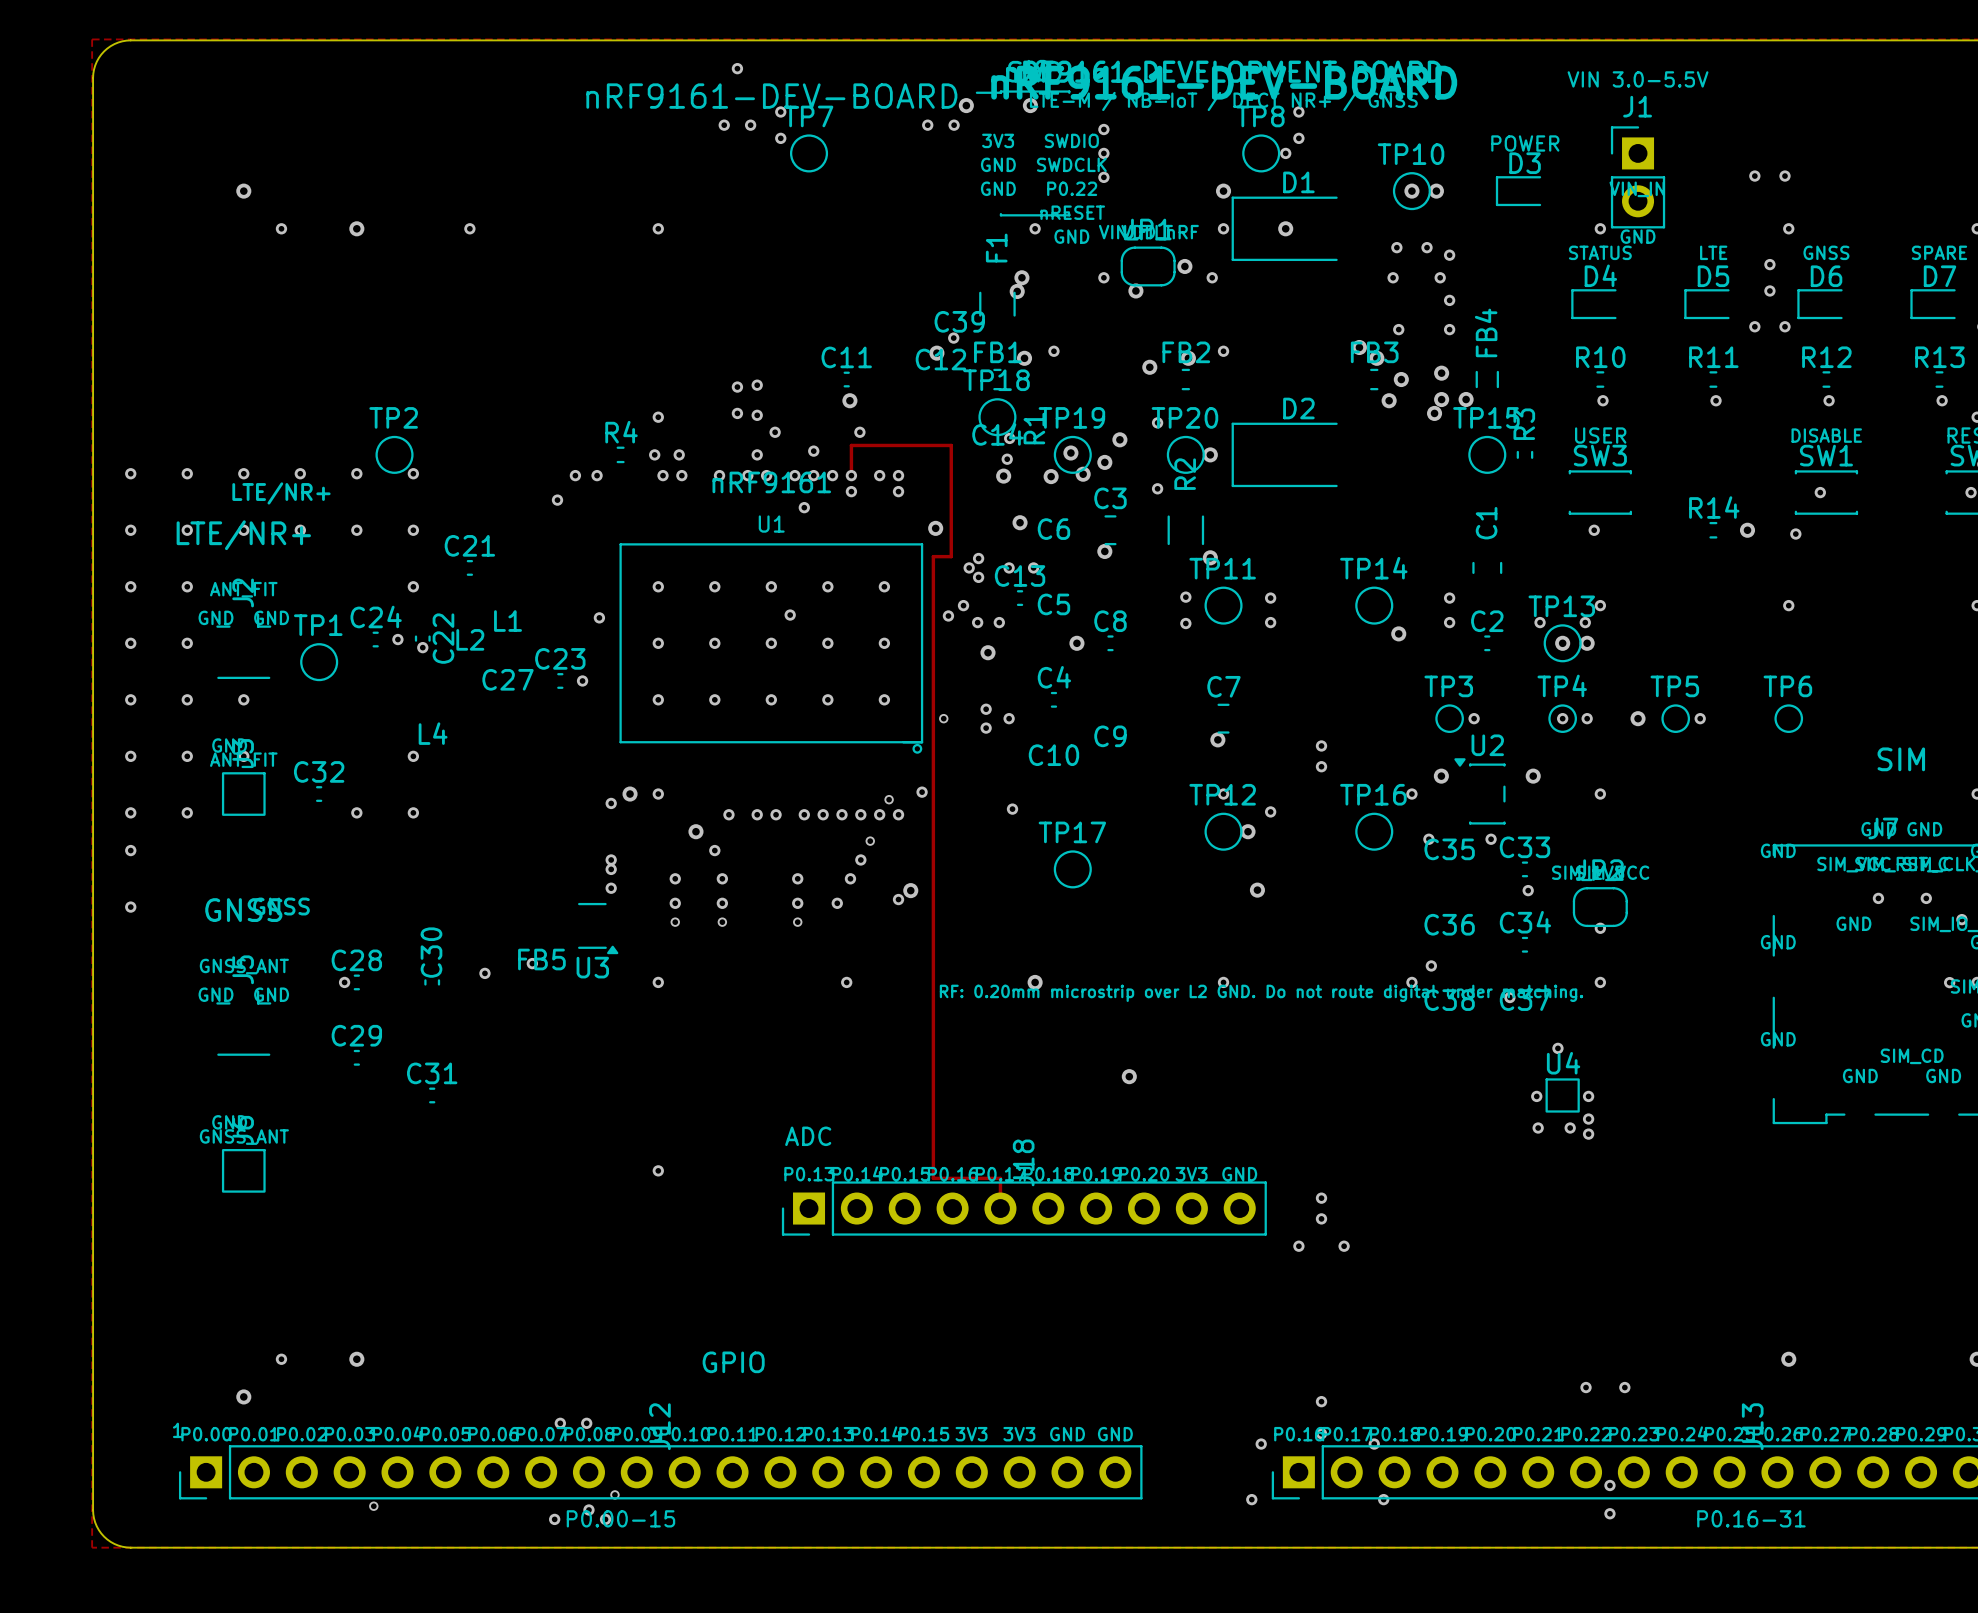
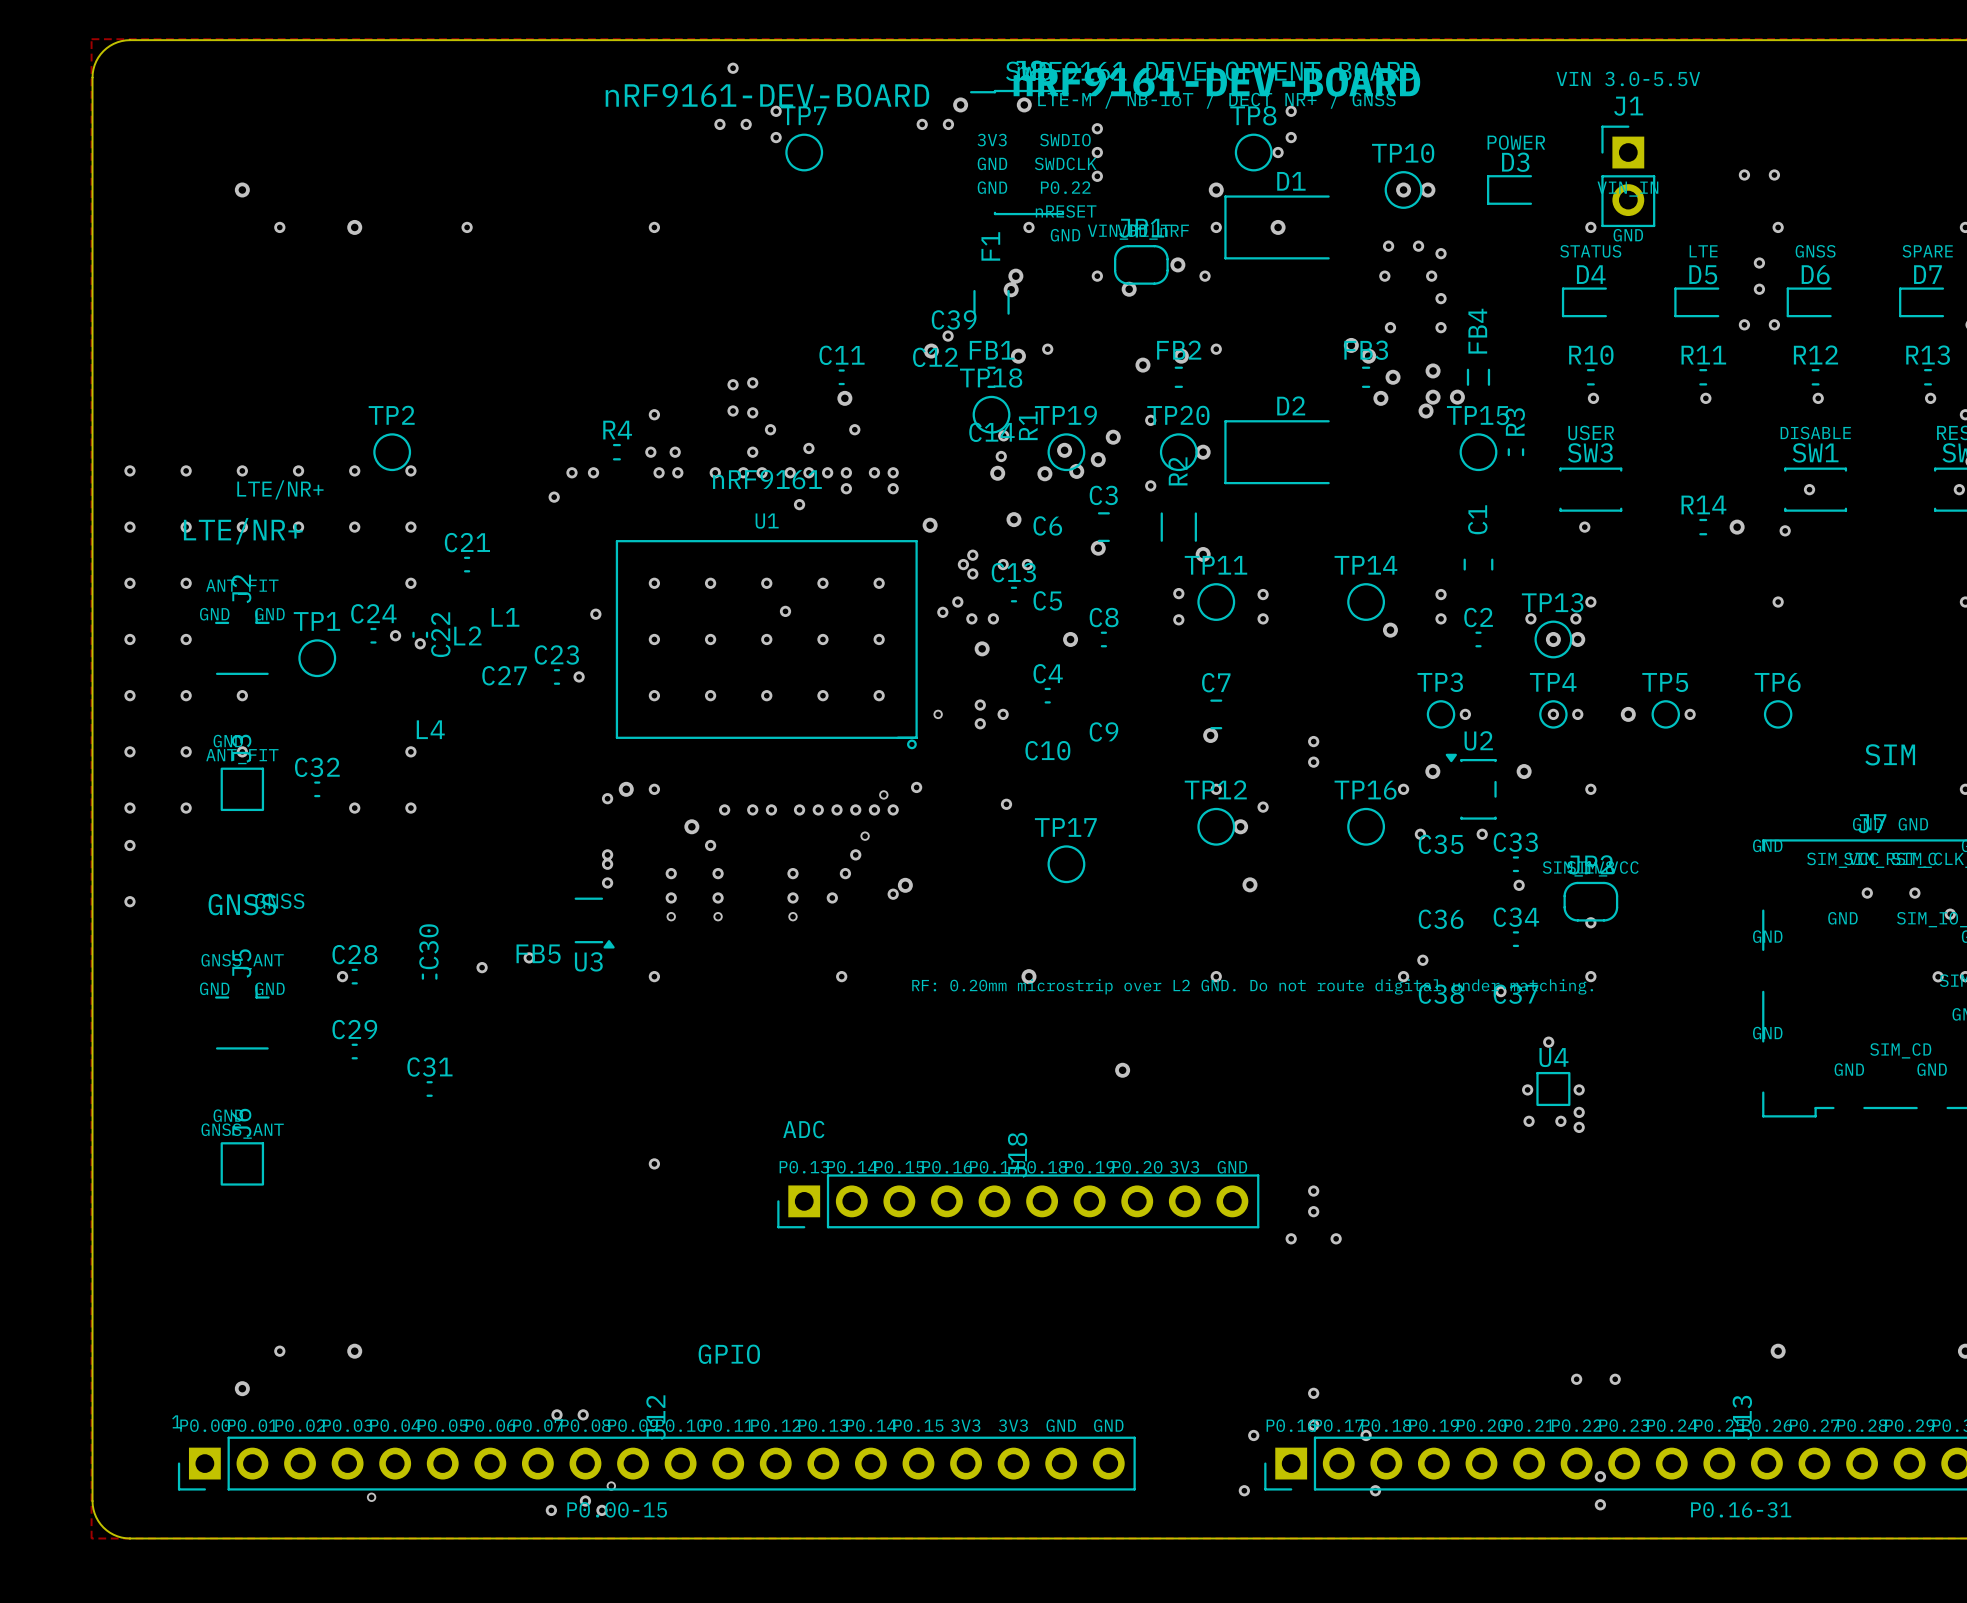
track: (851, 475) (851, 445) (951, 445) (951, 556) (933, 556) (933, 1178) (1000, 1178) (1000, 1195) -> none

